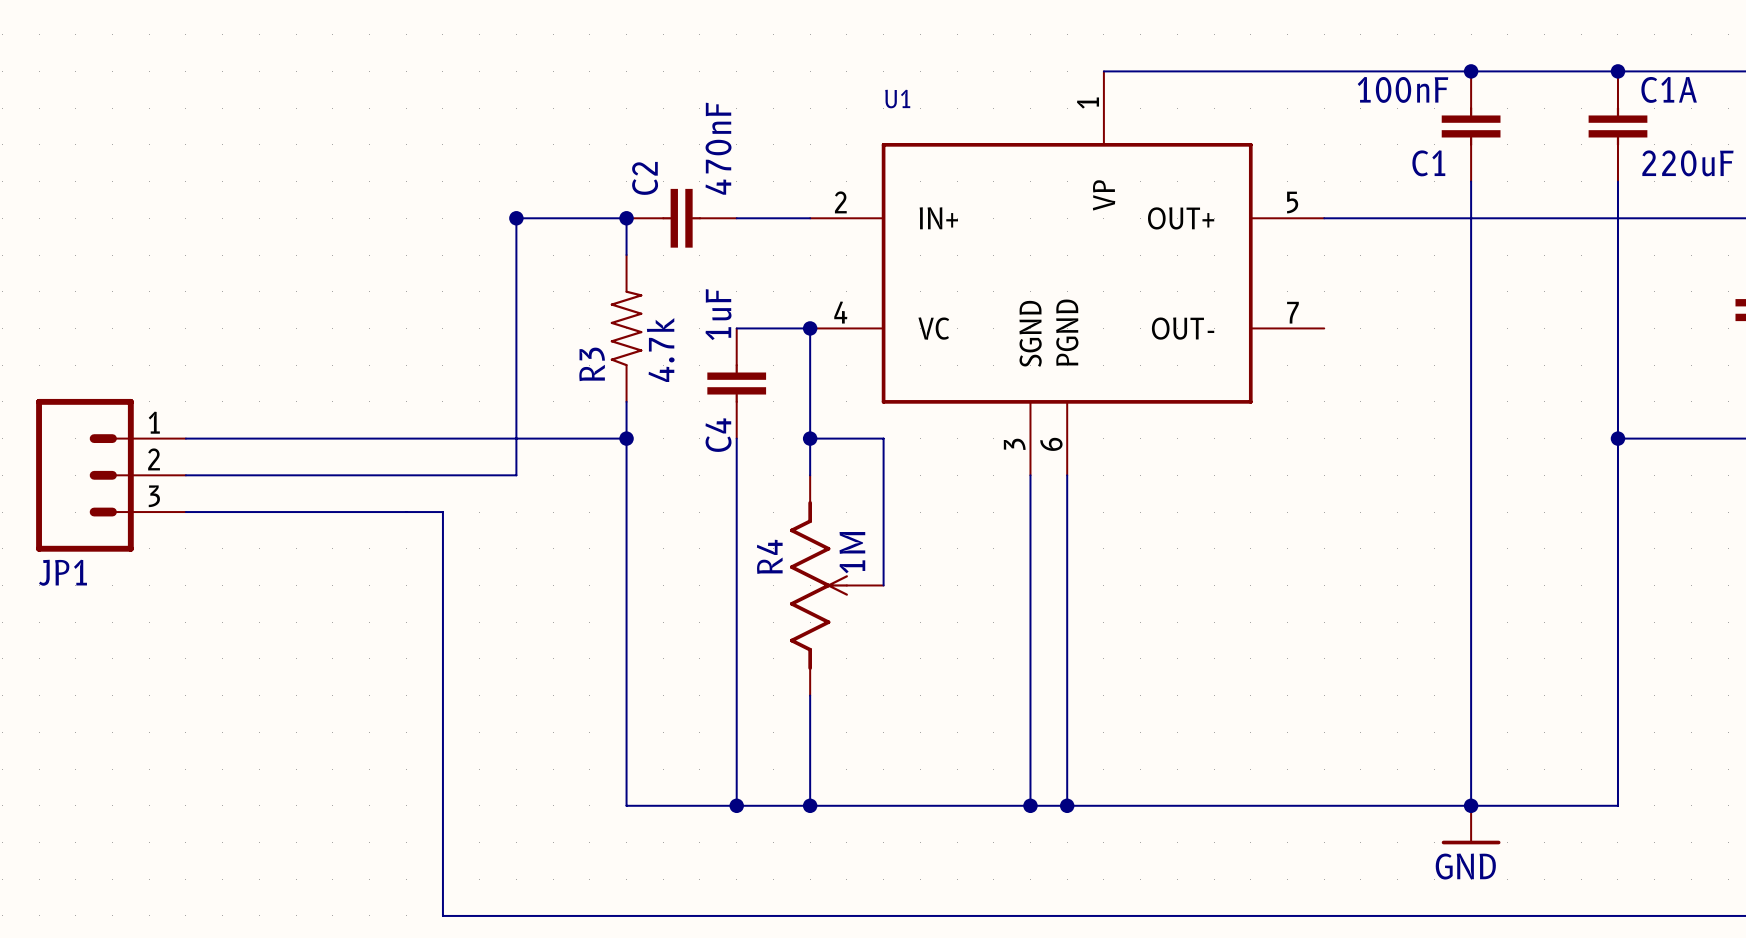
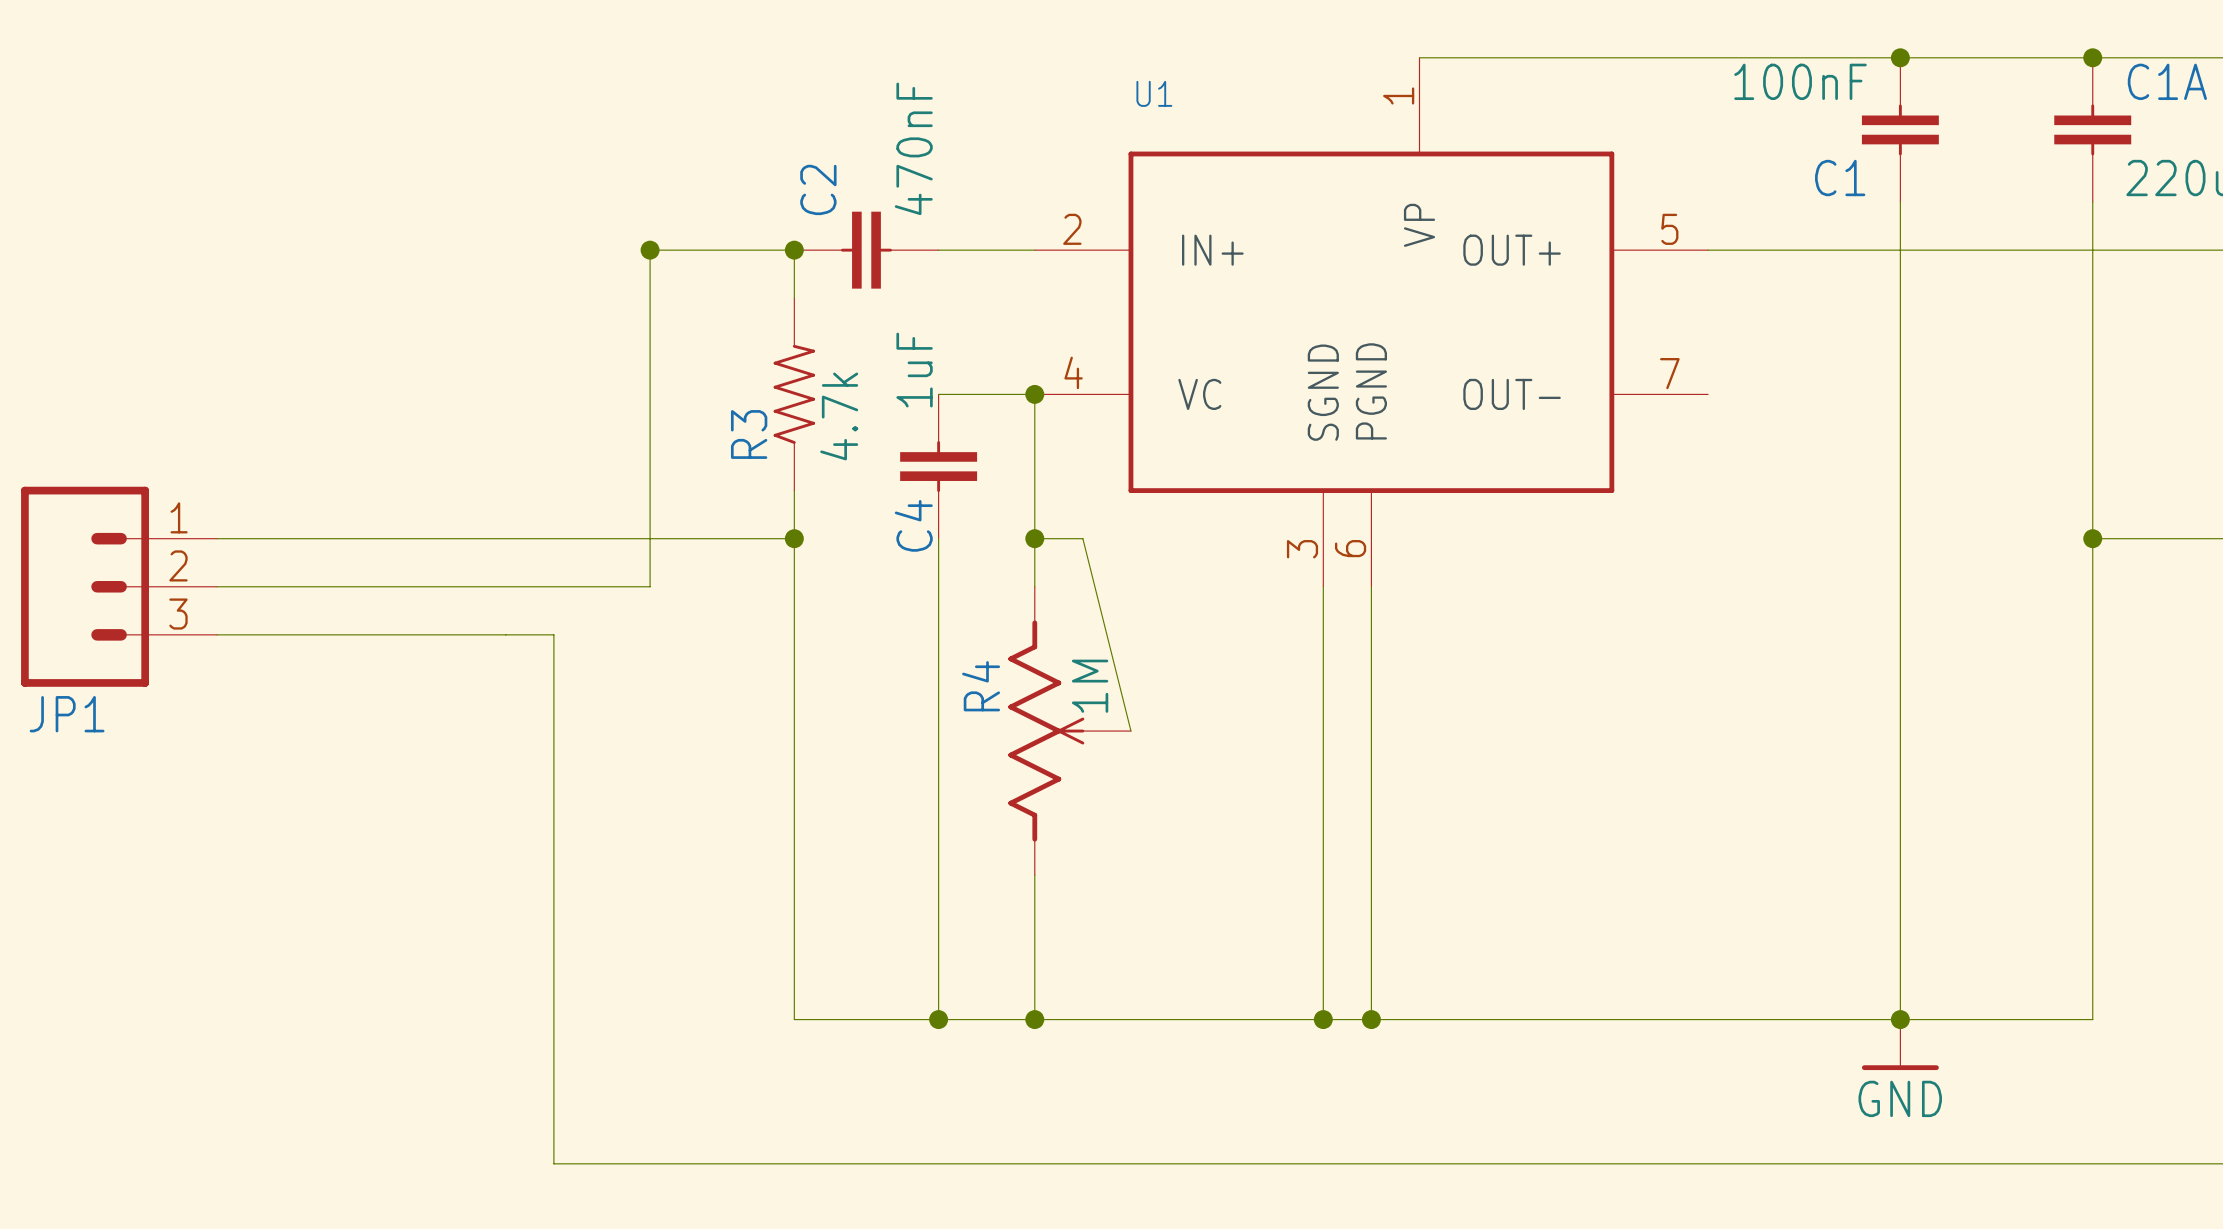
wire: (846, 438) (883, 438) (883, 585) -> (1082, 538) (1130, 731)

